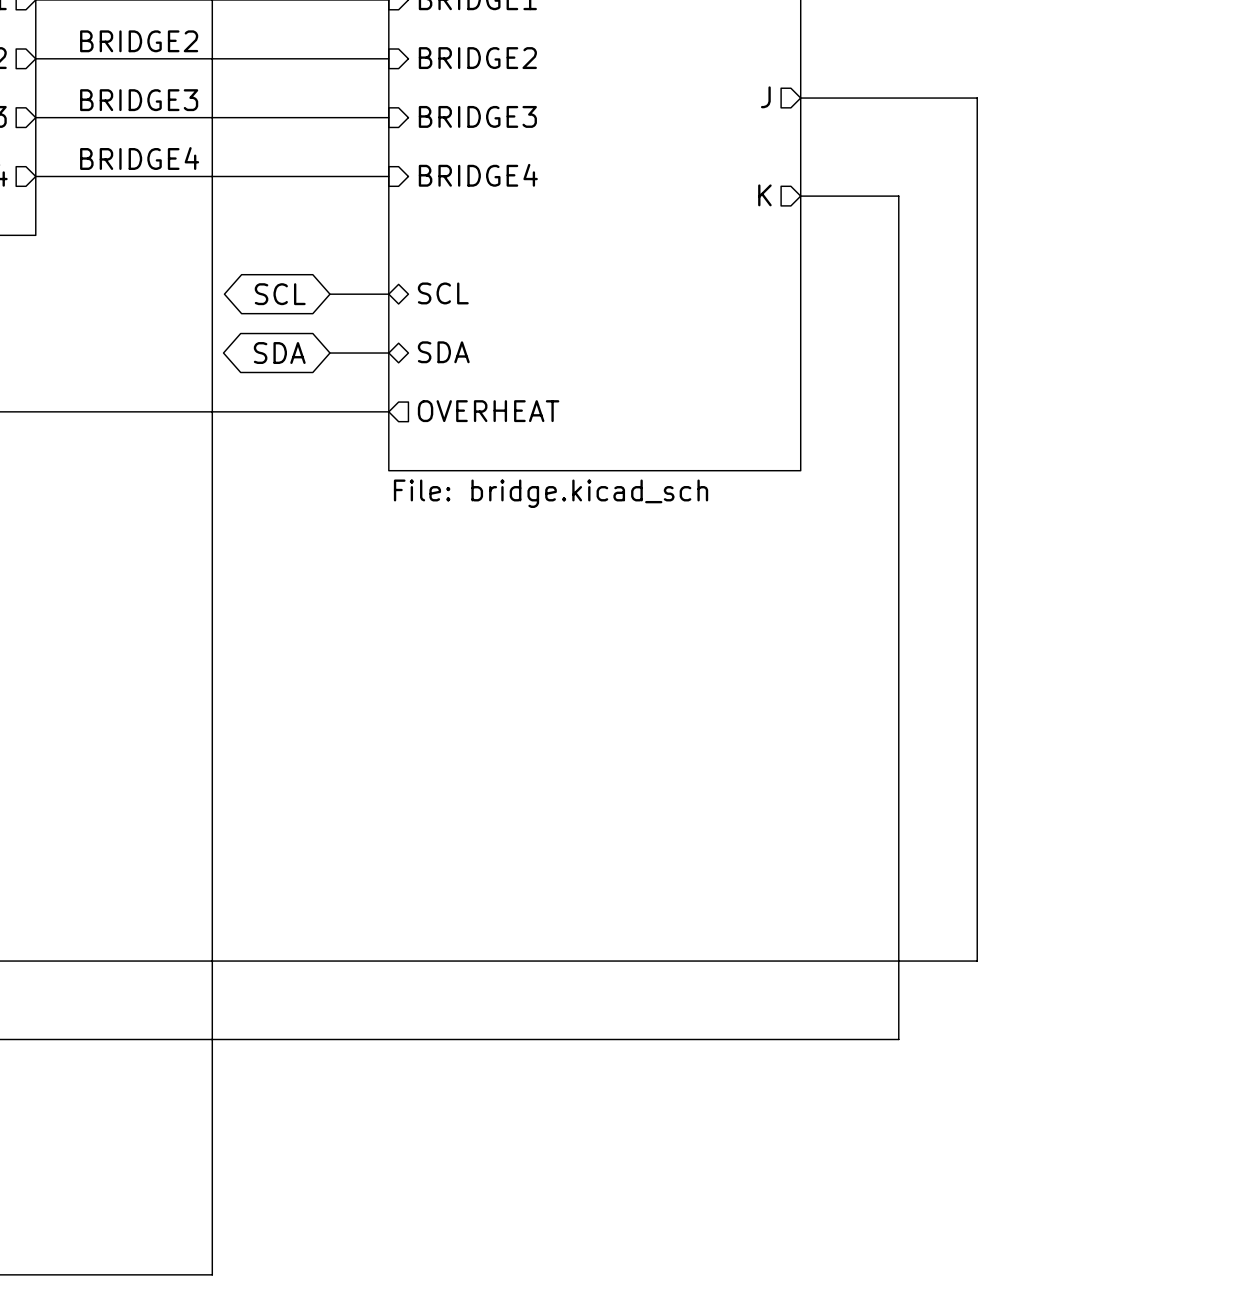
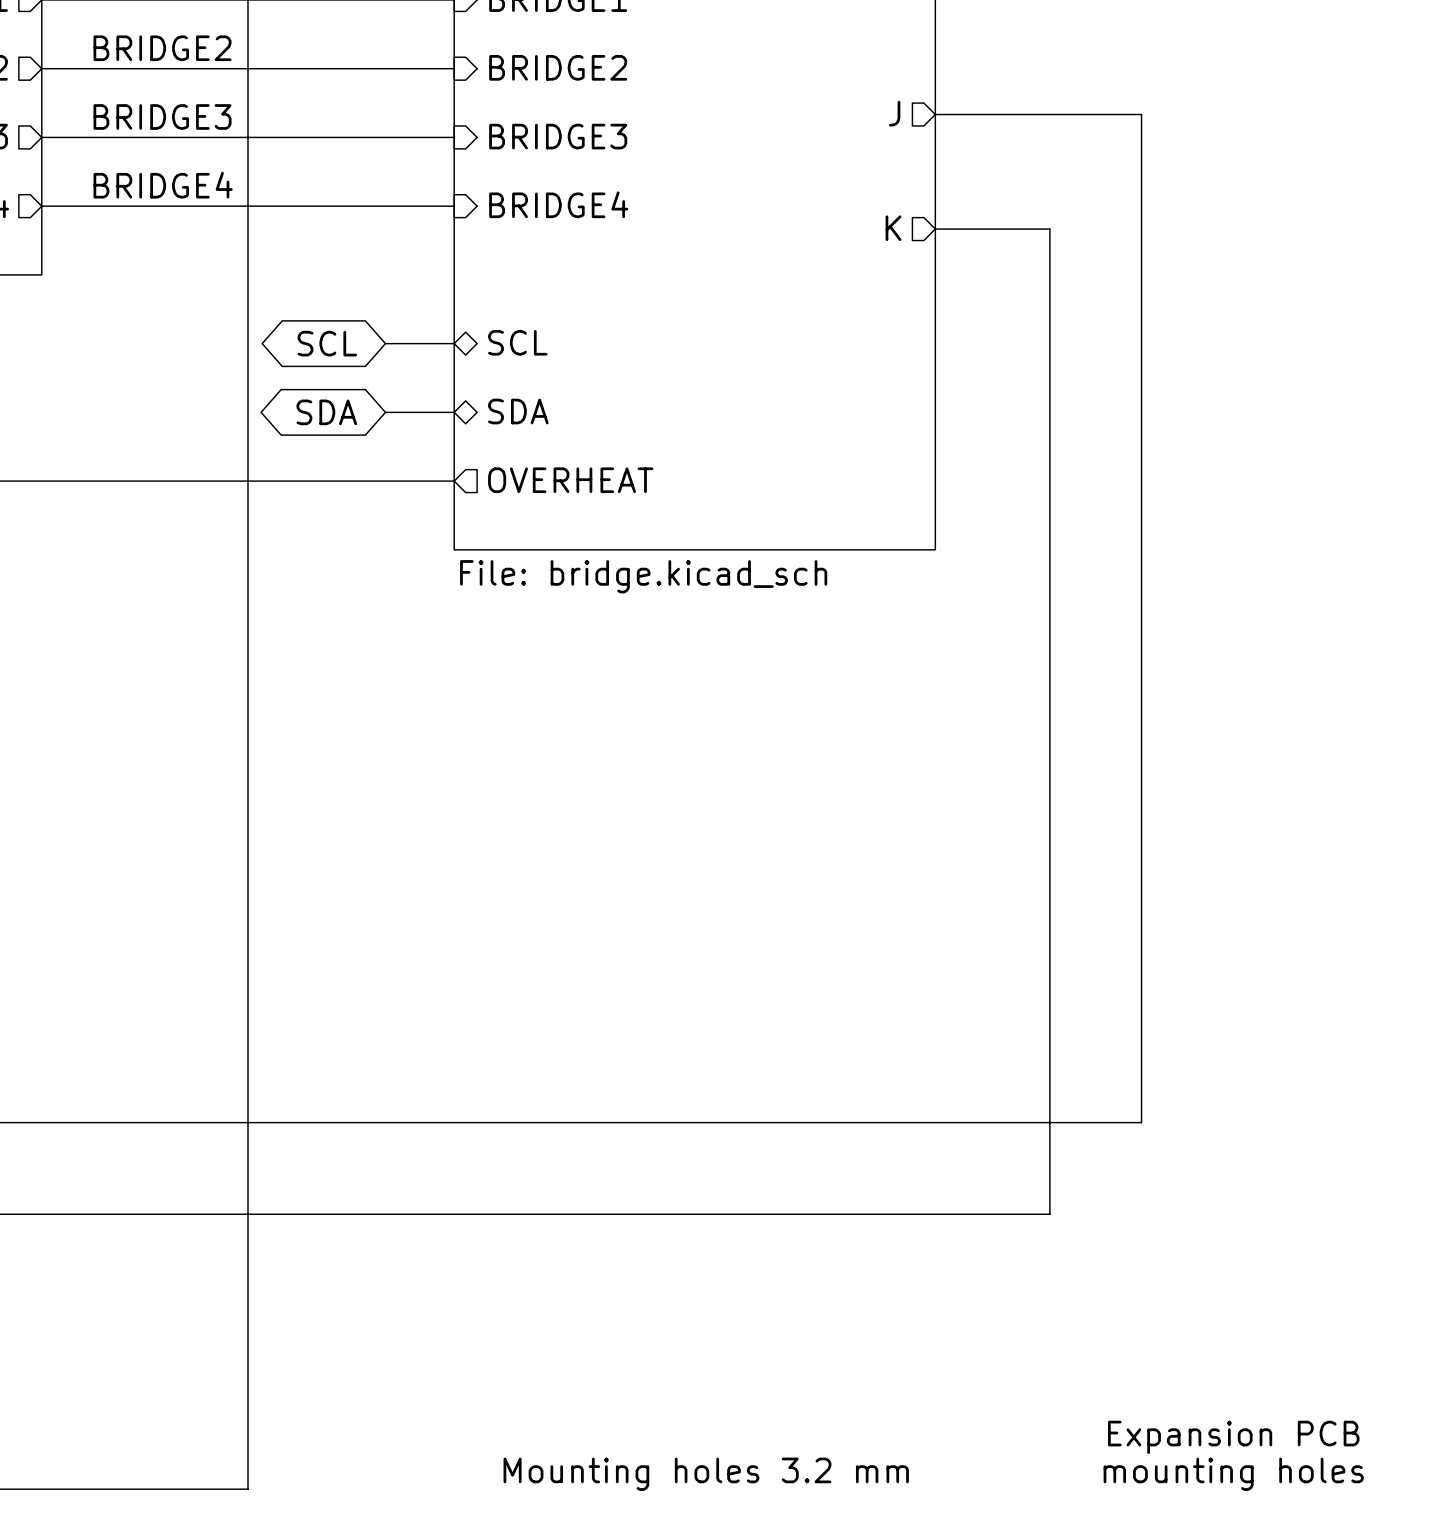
text: none -> Expansion PCB (1233, 1437)
text: none -> Mounting holes 3.2 mm (706, 1474)
text: none -> mounting holes (1233, 1474)

